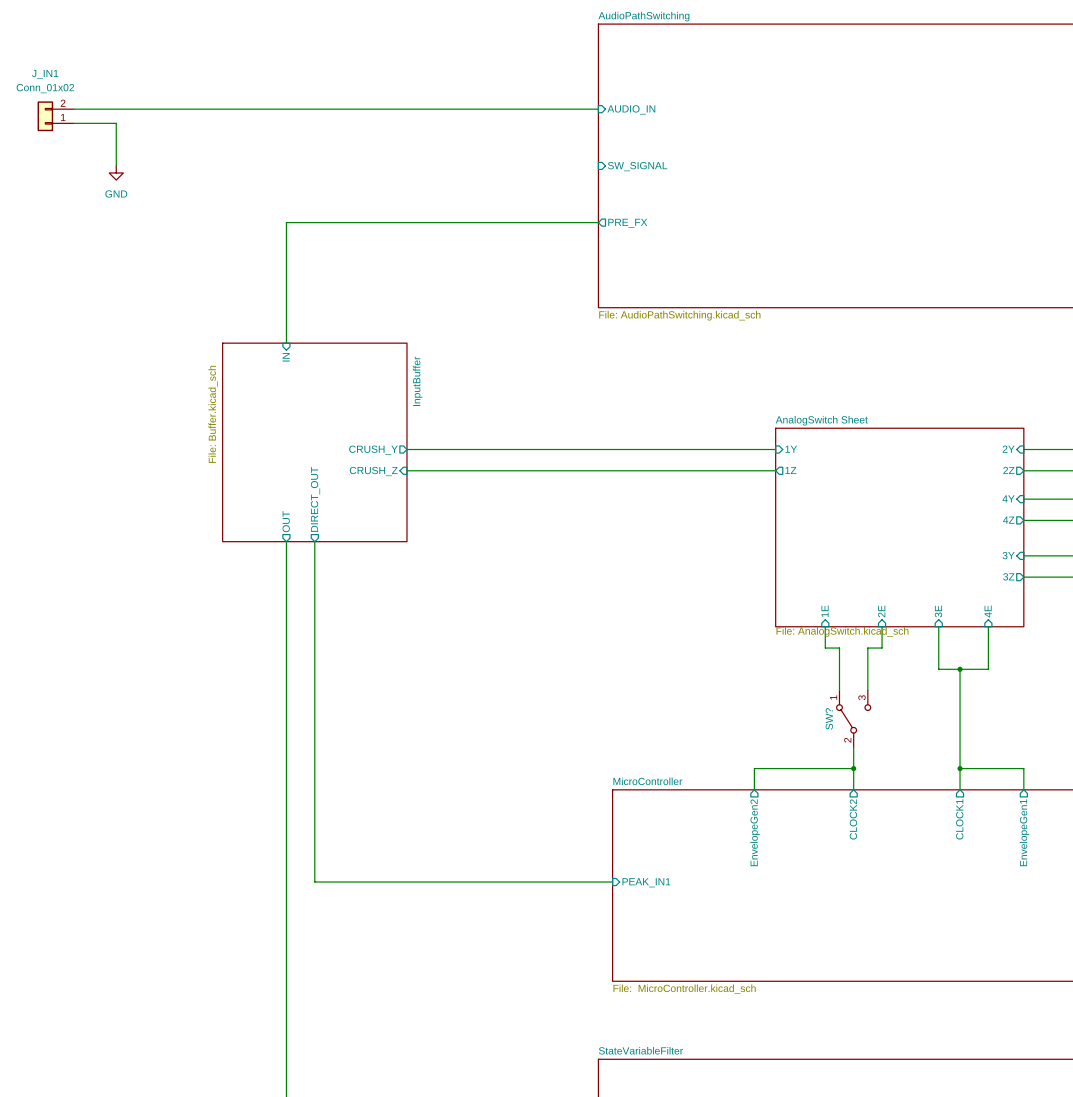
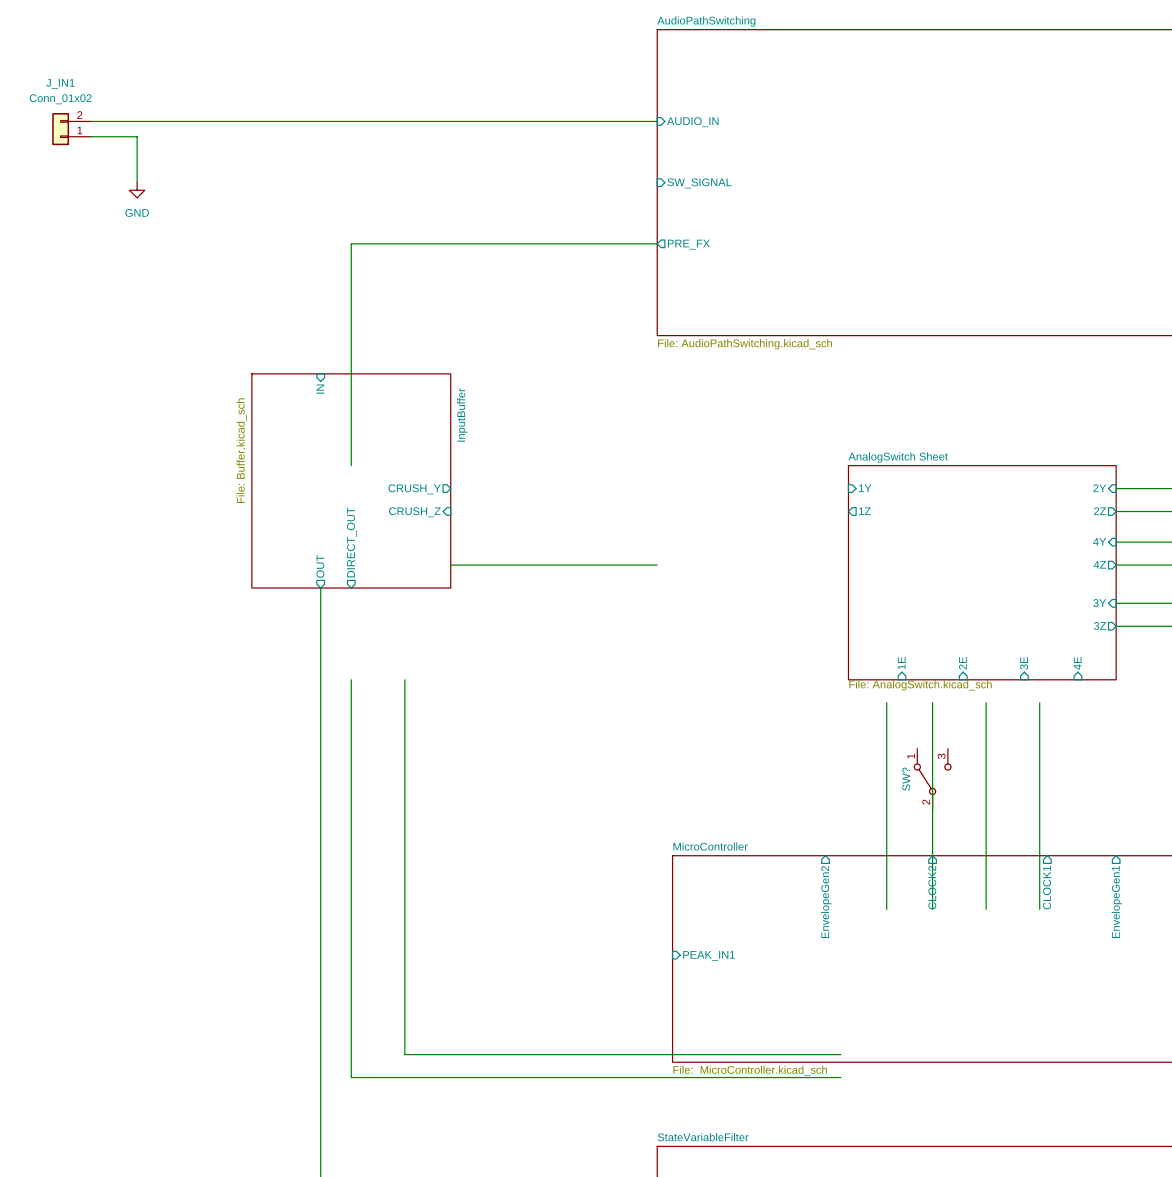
wire: (314, 222) (286, 222) (286, 343) -> (351, 243) (351, 465)
wire: (406, 449) (775, 449) -> none
wire: (406, 470) (775, 470) -> none
wire: none -> (450, 565) (657, 565)
wire: (314, 541) (314, 626) -> none
wire: none -> (404, 679) (404, 1054) (840, 1054)
wire: (825, 626) (825, 648) (839, 648) (839, 690) -> none
wire: (882, 626) (882, 648) (867, 648) (867, 690) -> none
wire: (938, 626) (938, 669) (988, 669) (988, 626) -> none
wire: none -> (886, 702) (886, 909)
wire: none -> (932, 702) (932, 809)
wire: none -> (986, 702) (986, 909)
wire: none -> (1039, 702) (1039, 909)
wire: (960, 669) (960, 789) -> none
junction: (960, 669) -> none
wire: (853, 768) (754, 768) (754, 789) -> none
junction: (853, 768) -> none
wire: (960, 768) (1023, 768) (1023, 789) -> none
junction: (960, 768) -> none
wire: none -> (932, 855) (932, 909)
wire: (314, 882) (612, 882) -> (351, 955) (351, 1077) (840, 1077)

